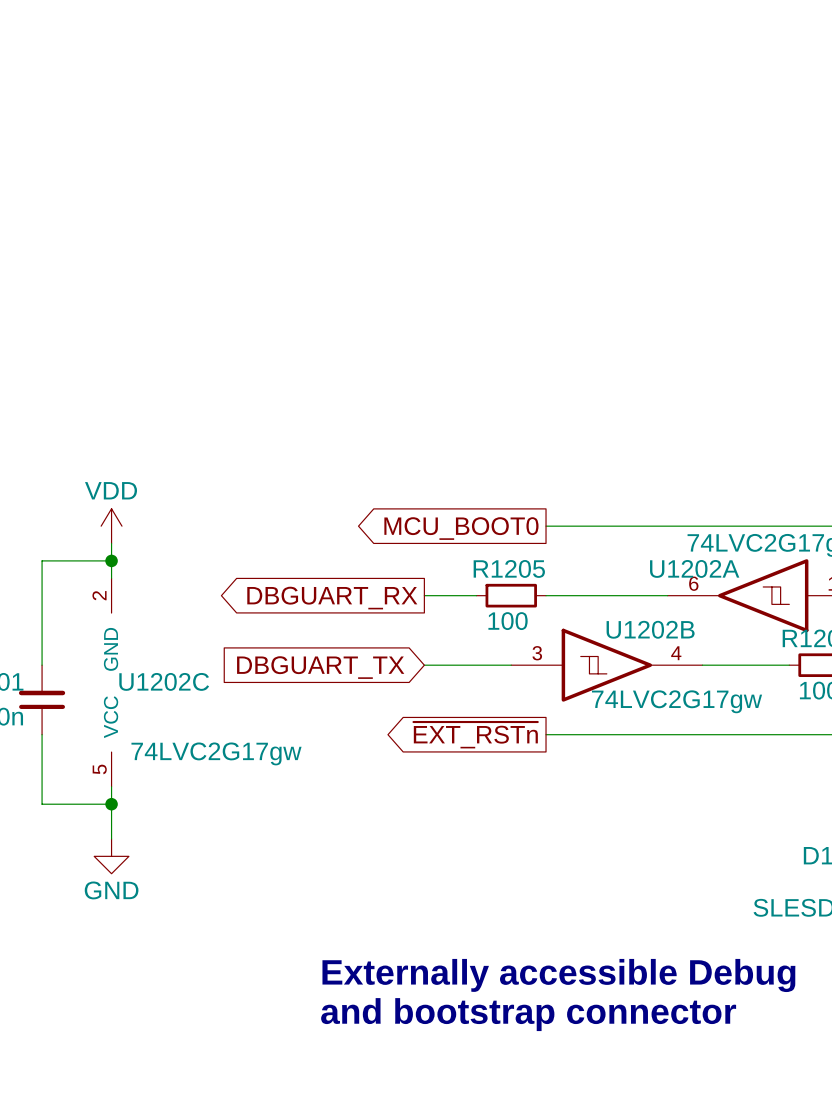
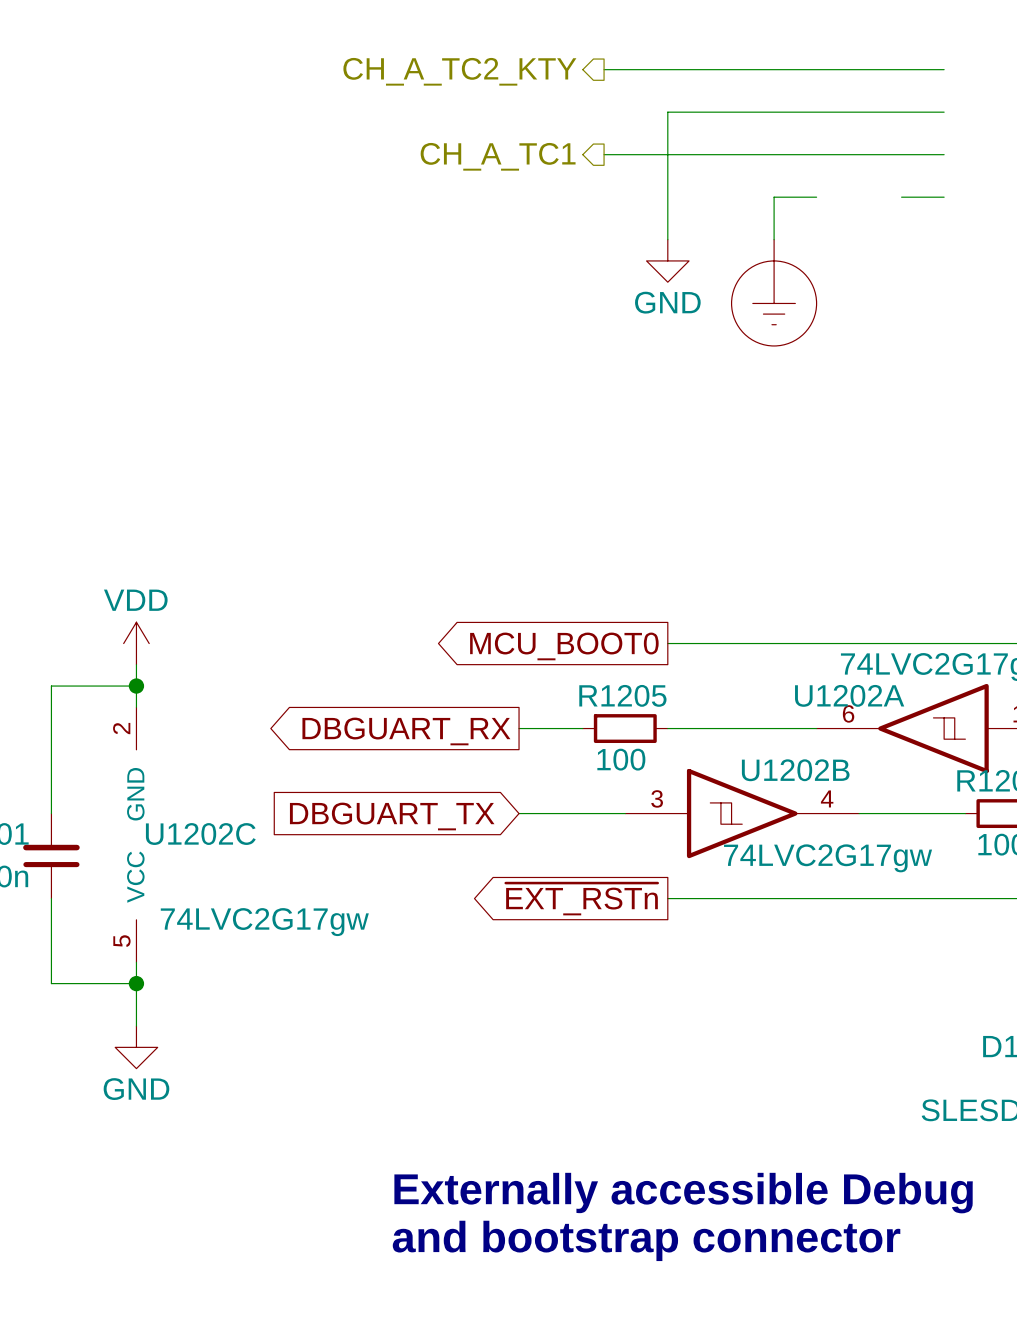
wire: none -> (604, 69) (944, 69)
hierarchical label: none -> CH_A_TC2_KTY (459, 71)
wire: none -> (944, 112) (667, 112) (667, 239)
wire: none -> (604, 154) (944, 154)
hierarchical label: none -> CH_A_TC1 (498, 156)
wire: none -> (816, 197) (774, 197) (774, 239)
wire: none -> (901, 197) (944, 197)
power symbol: none -> GND (667, 260)
power symbol: none -> (774, 292)

